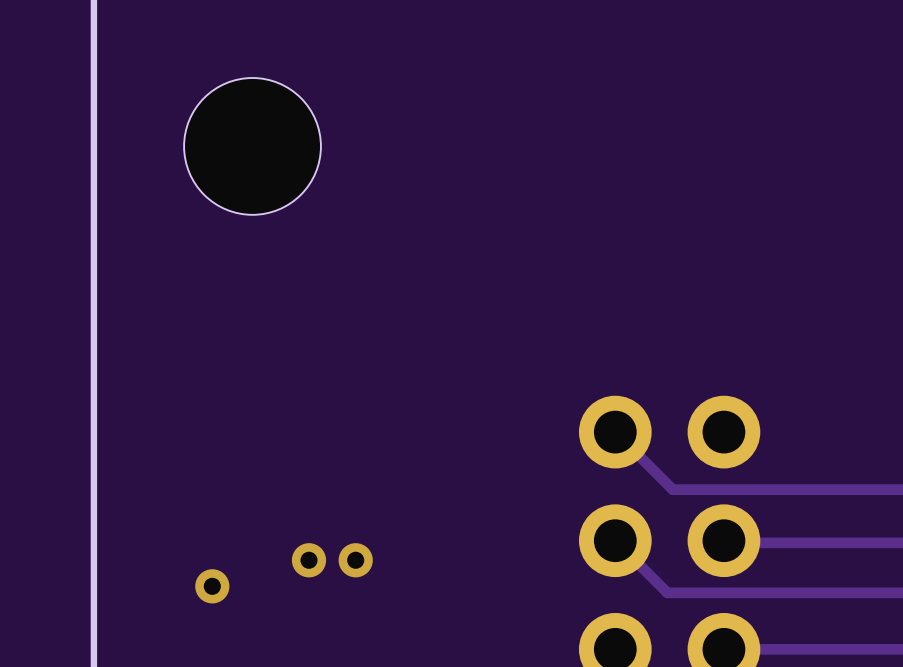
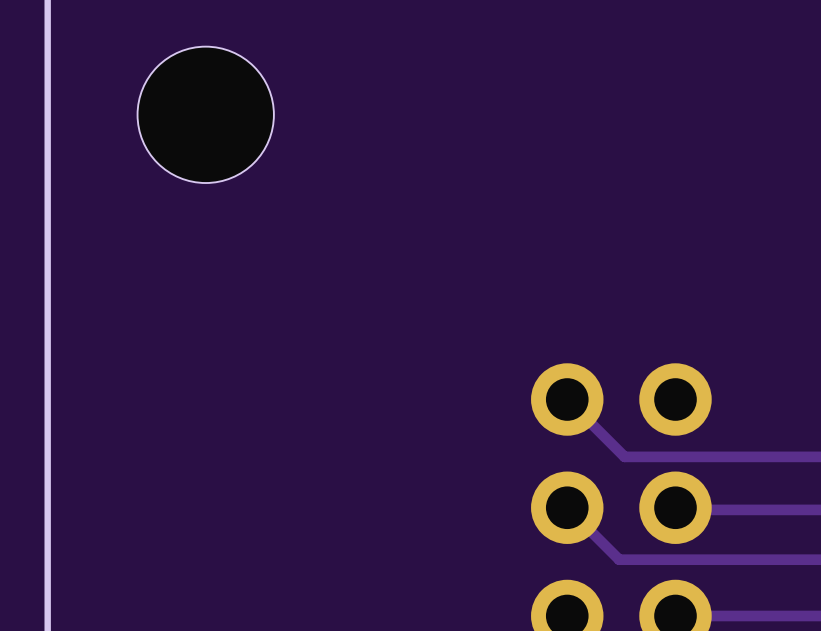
via: (308, 560) -> none
via: (355, 560) -> none
via: (212, 586) -> none

